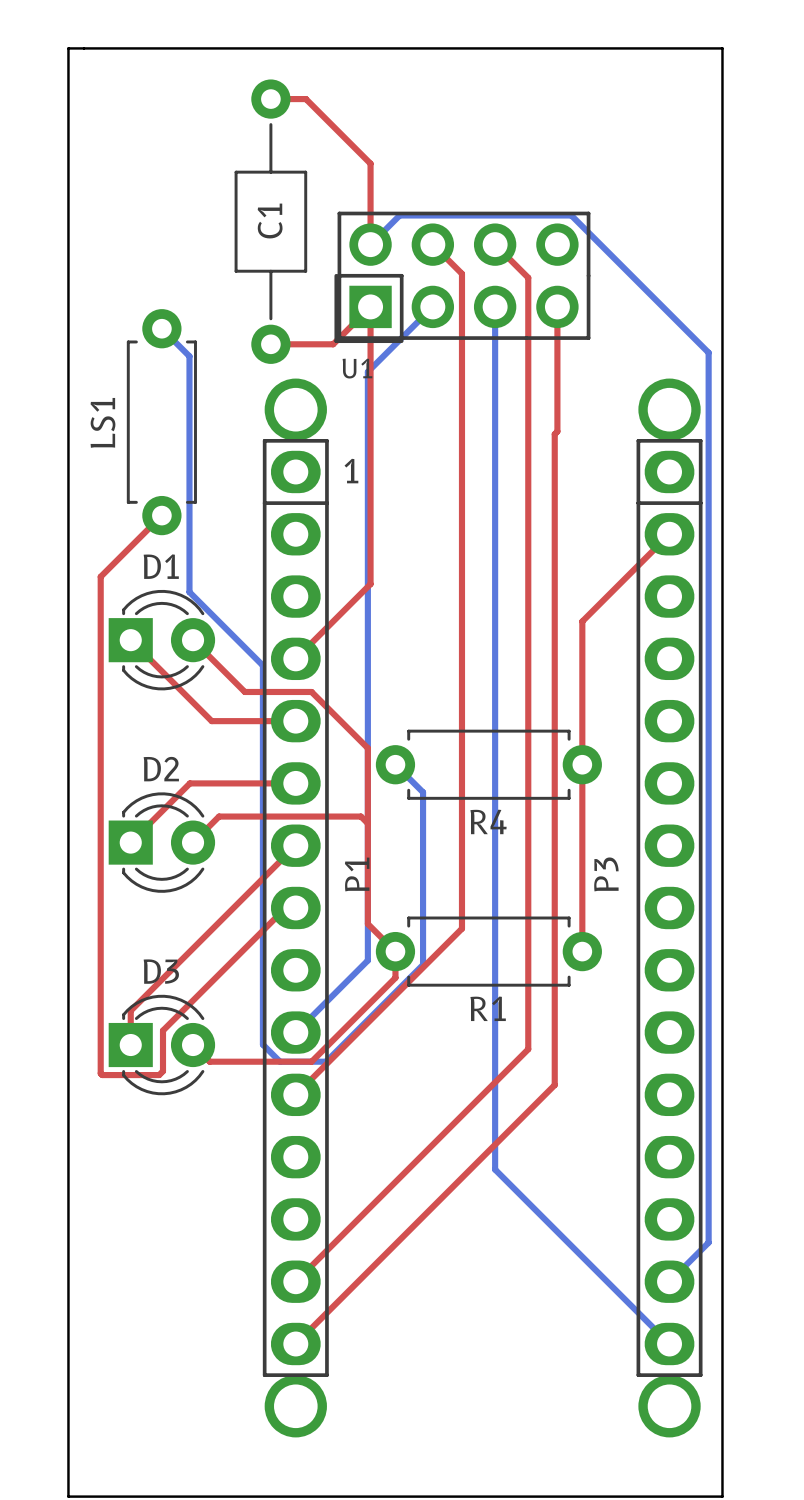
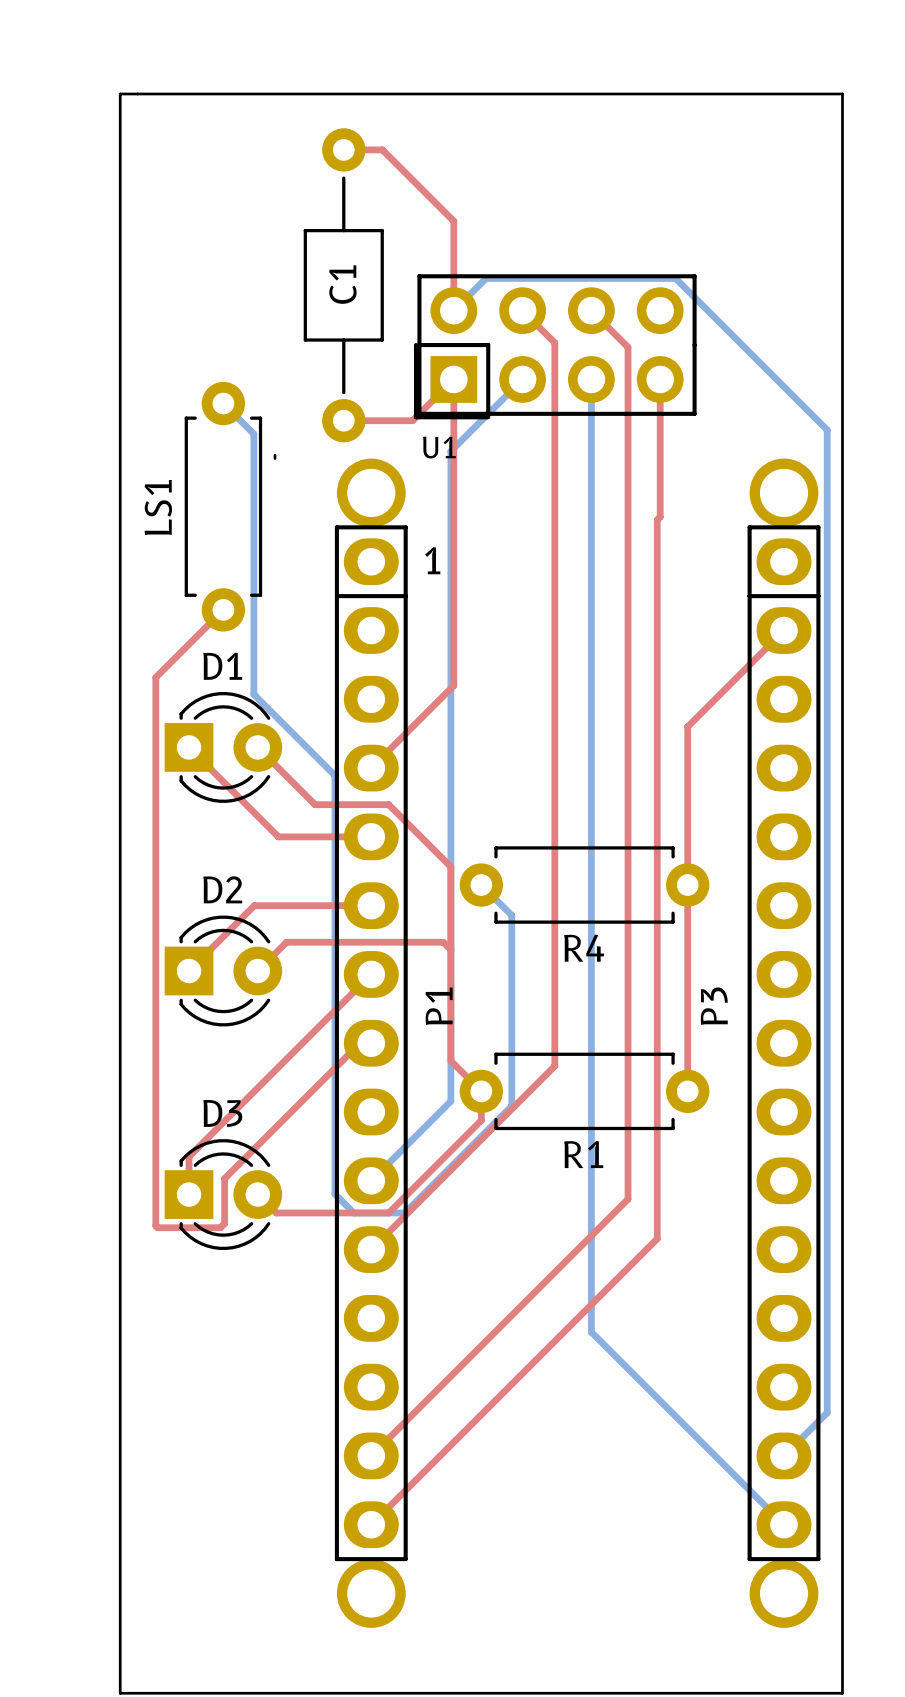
board edge: none -> (275, 455) (275, 458)

